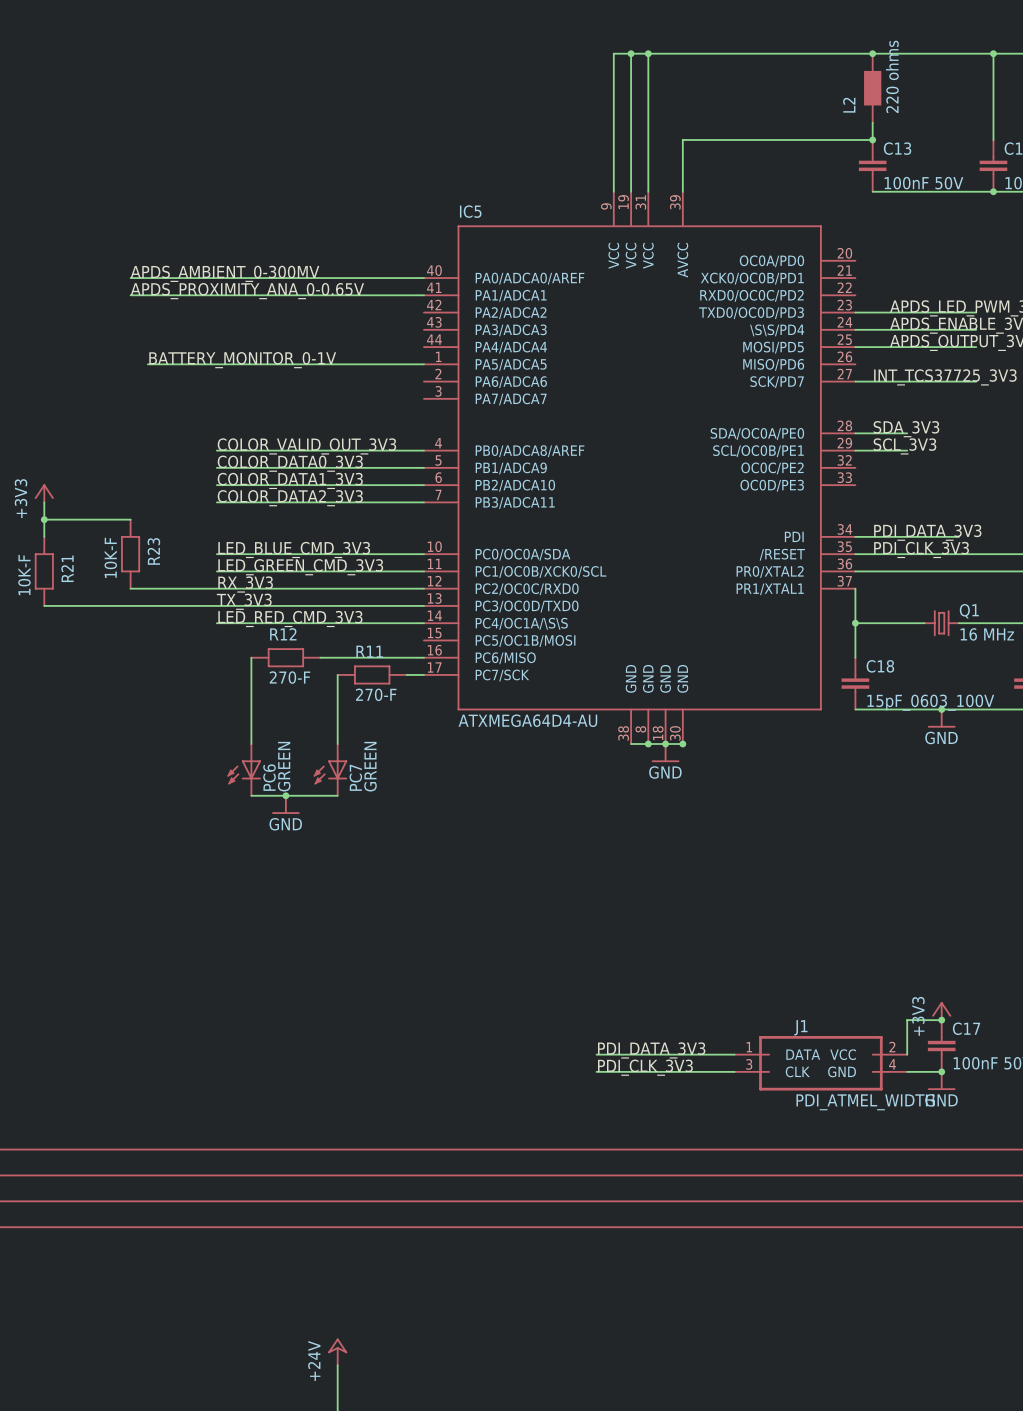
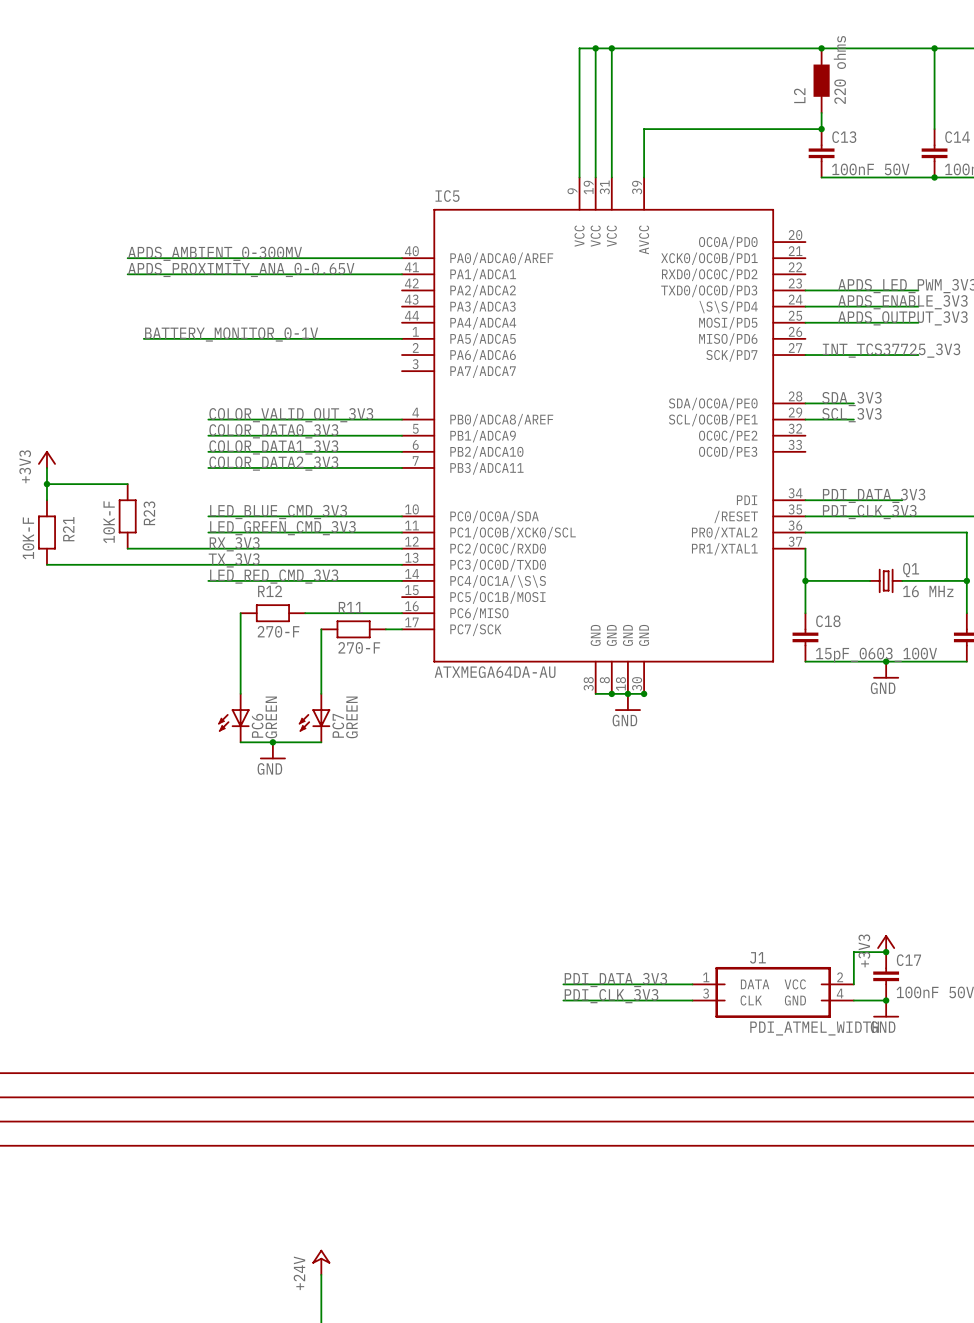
IC5 value: ATXMEGA64D4-AU (527, 720) -> ATXMEGA64DA-AU (495, 672)

